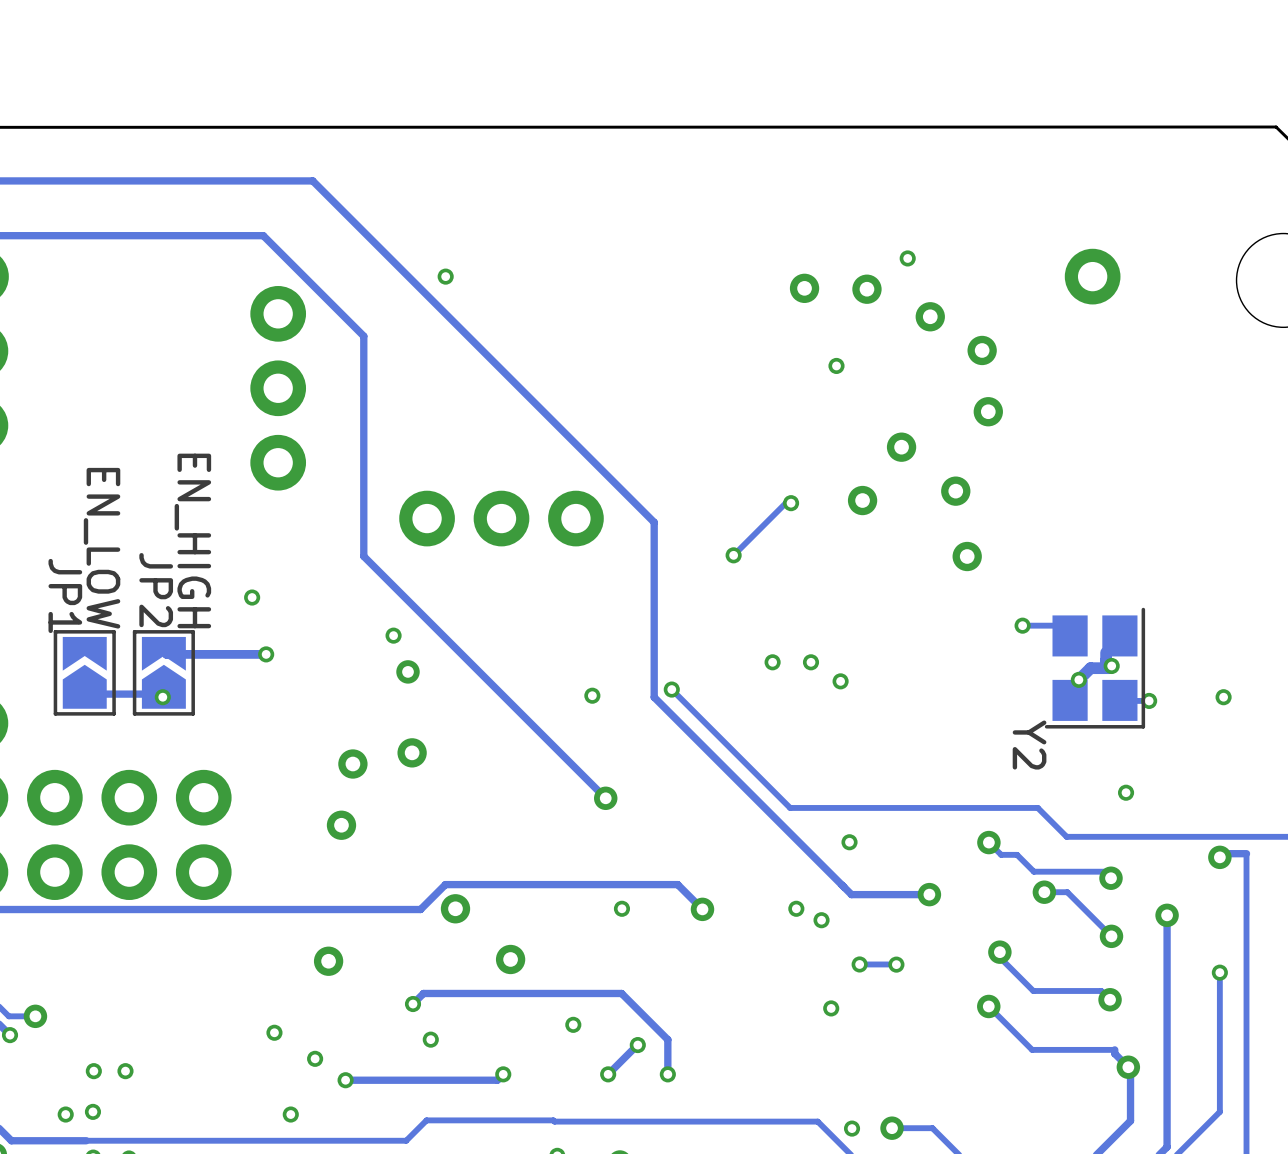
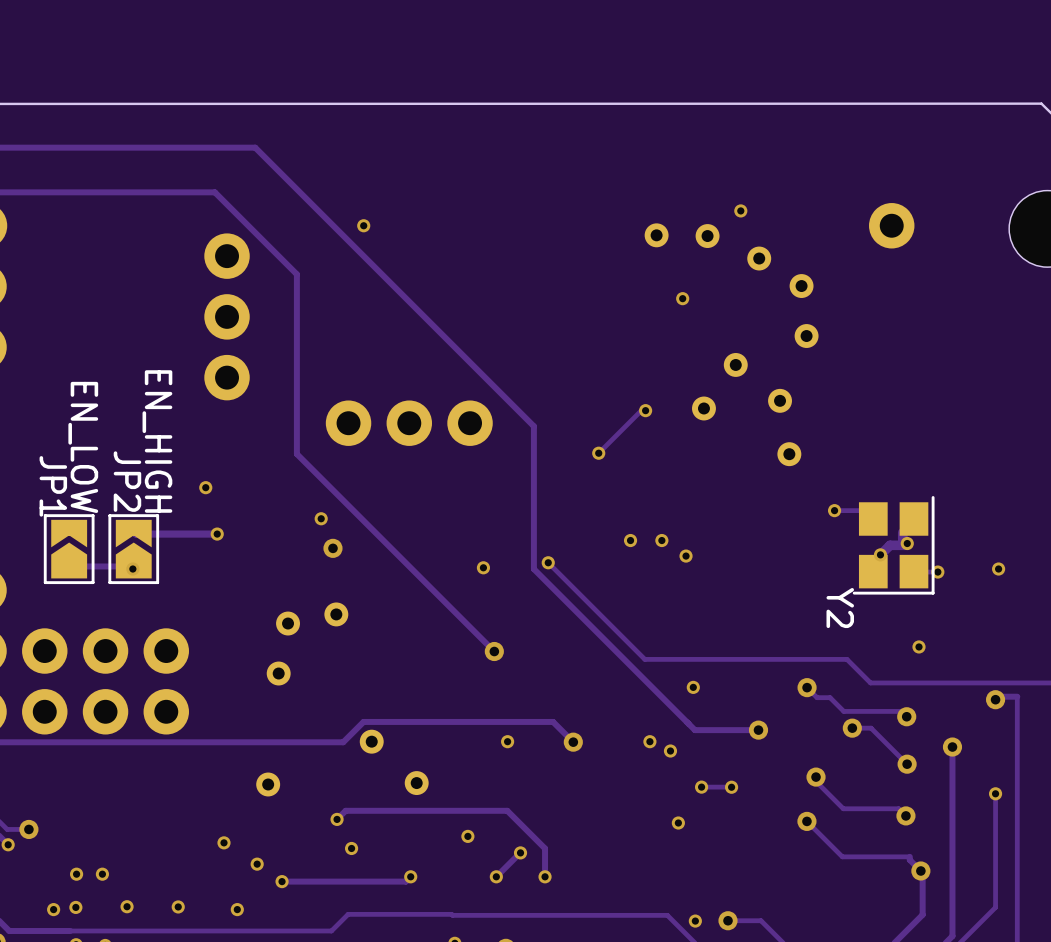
via: none -> (127, 906)
via: none -> (178, 906)

